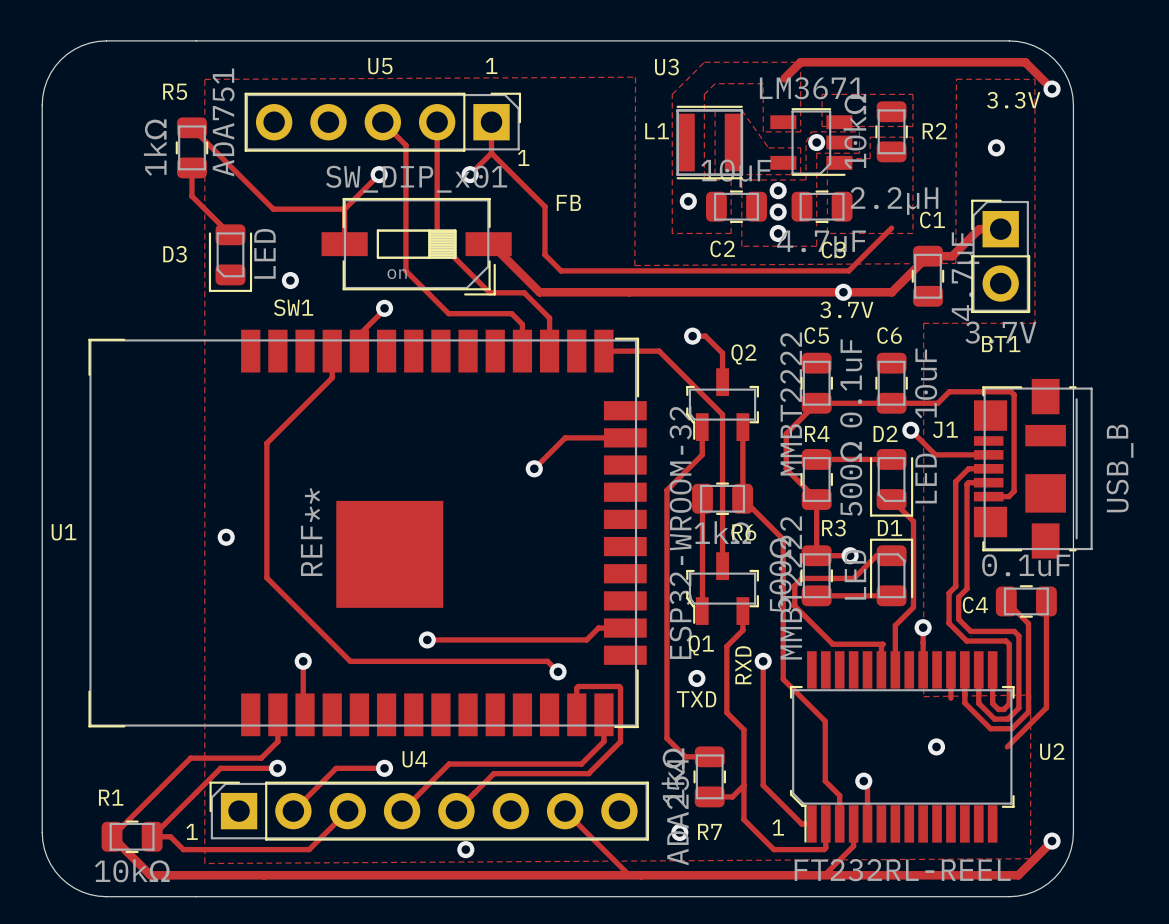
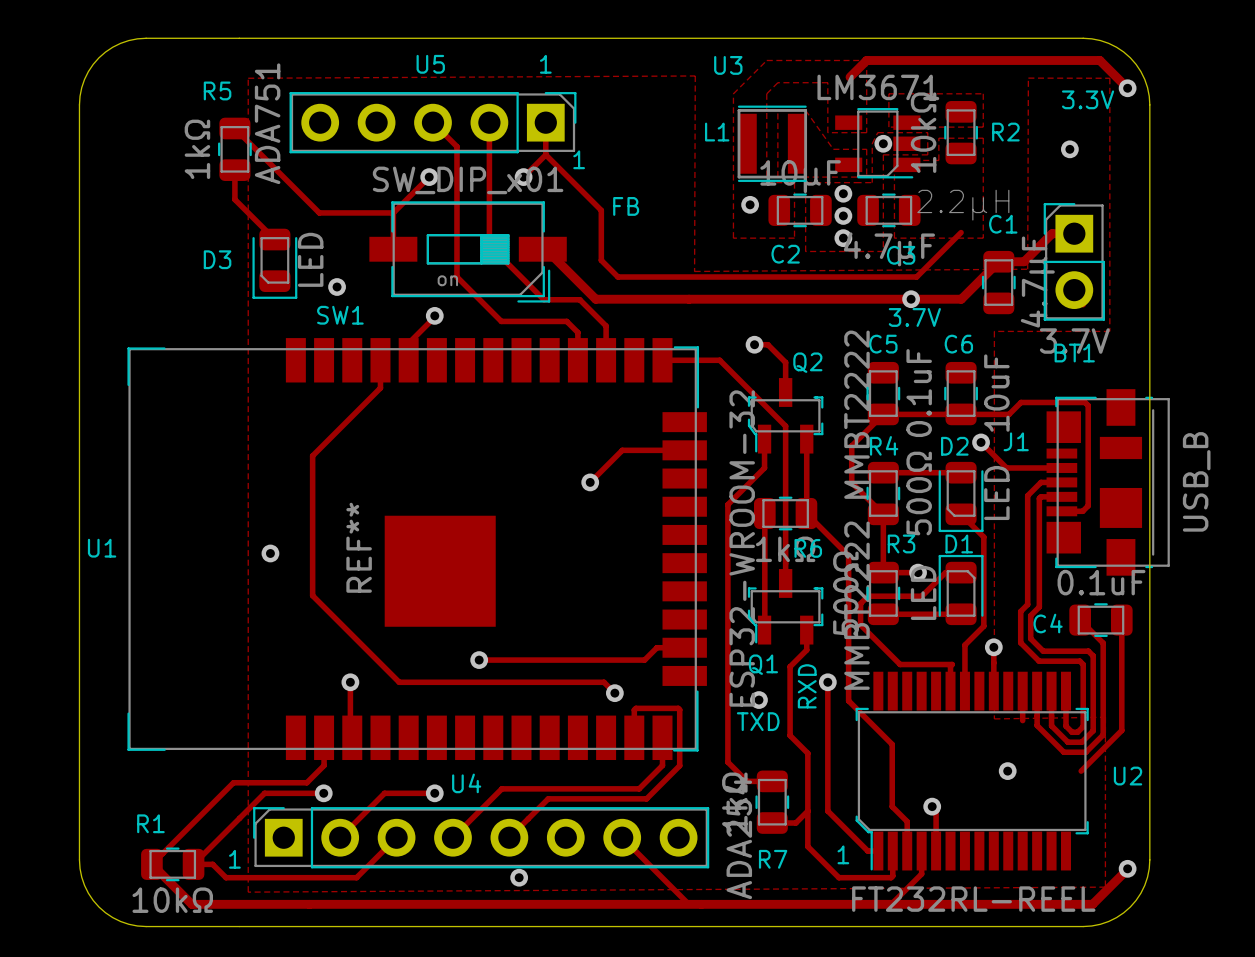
via: (679, 832) -> none

